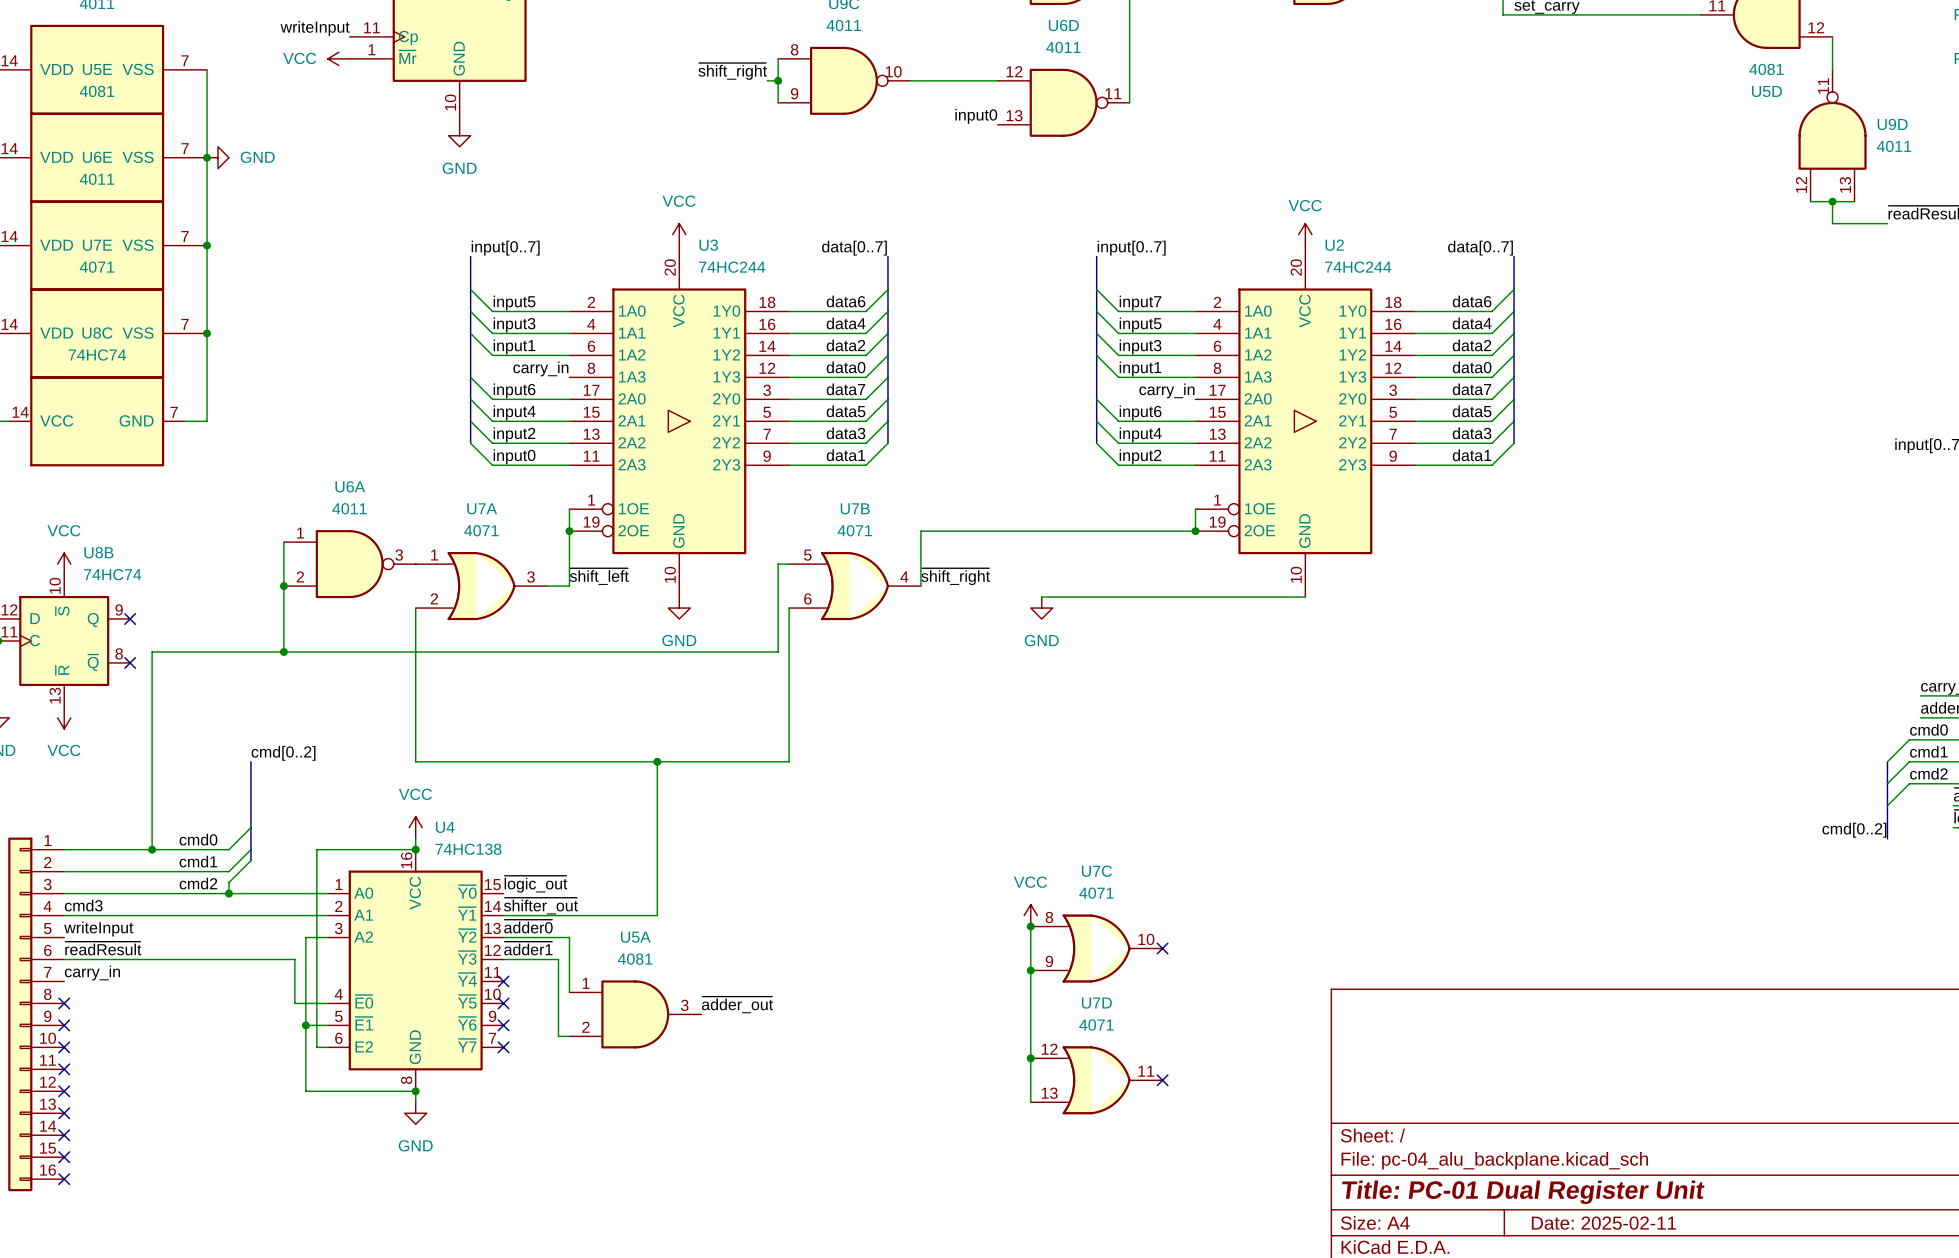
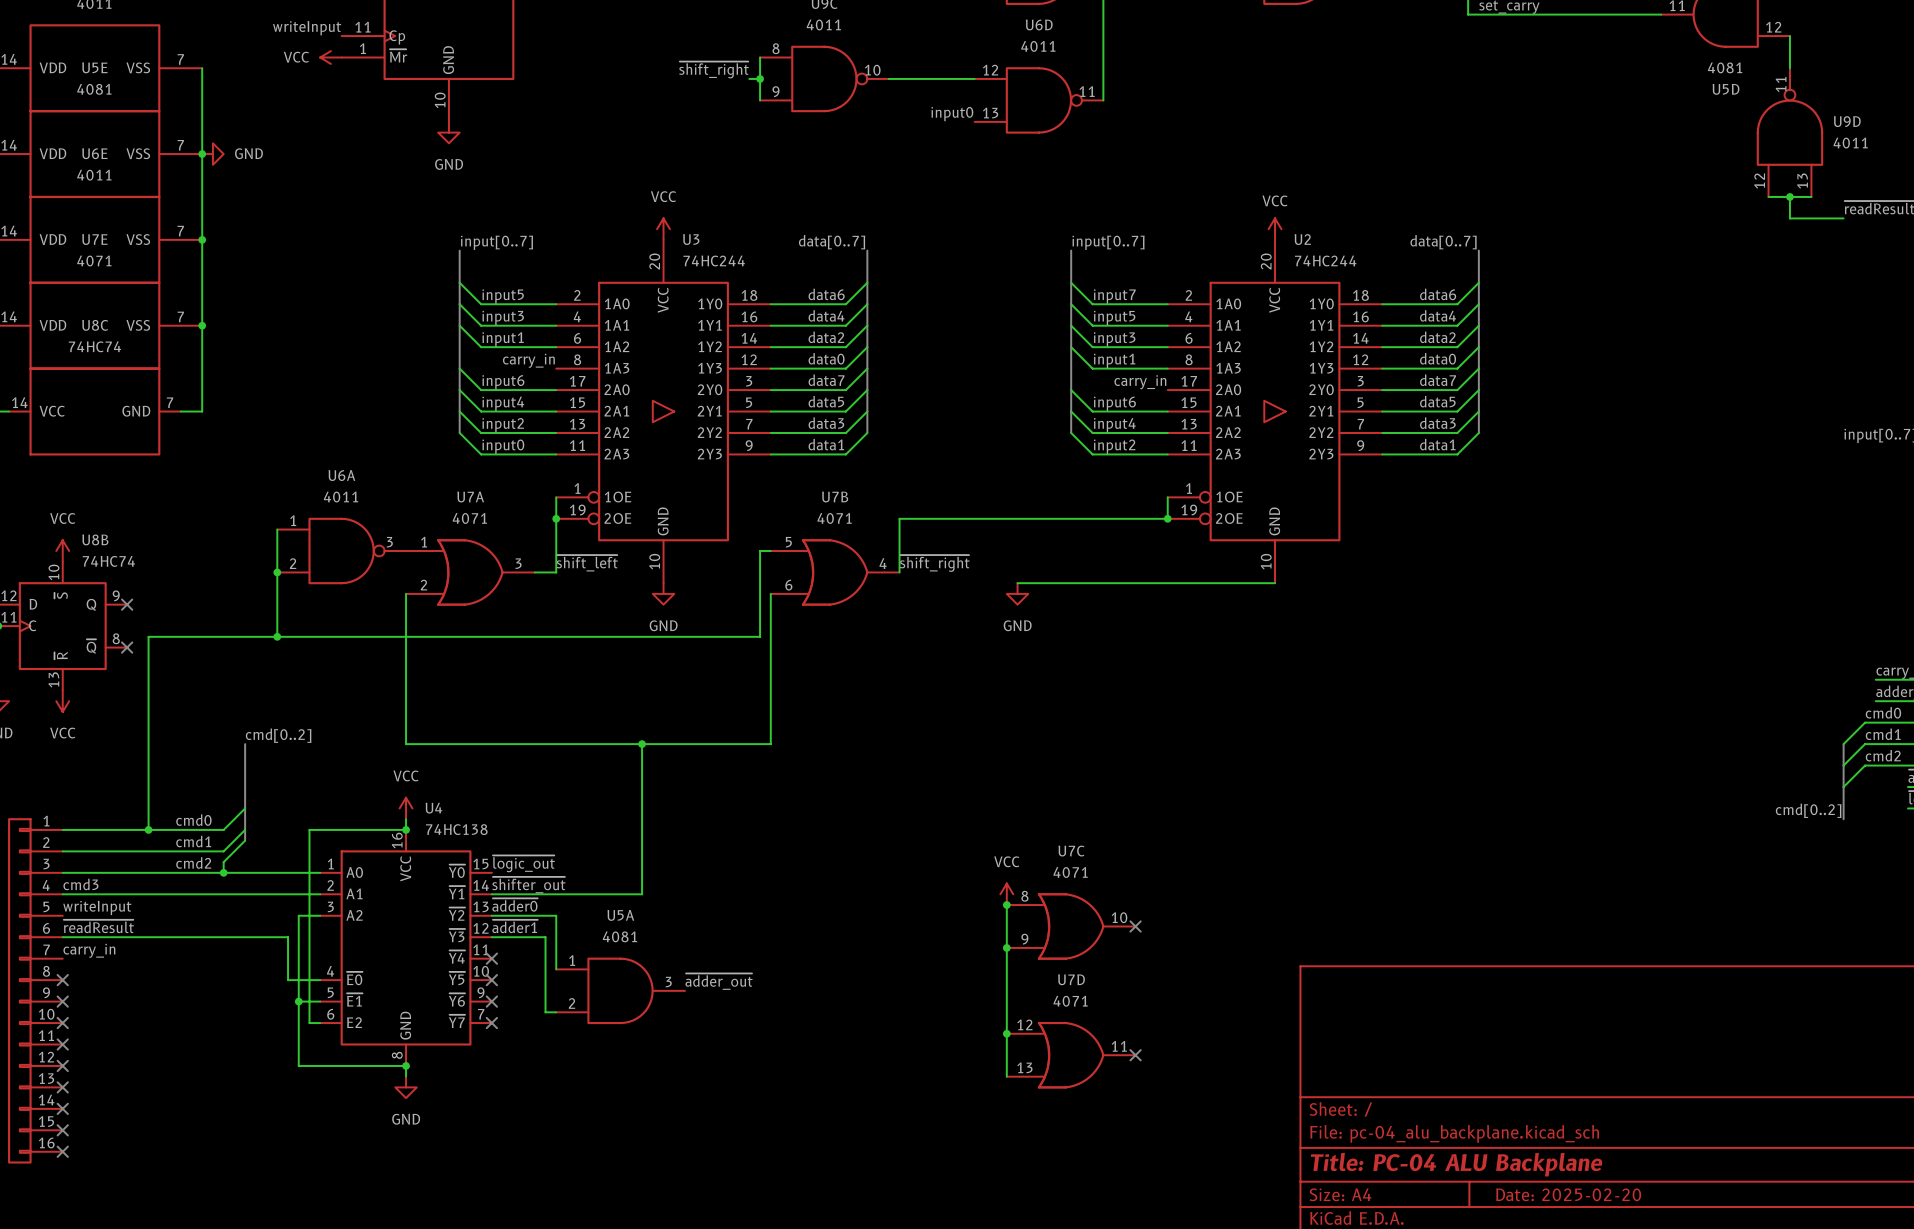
title block: Title: PC-01 Dual Register Unit (1523, 1192) -> Title: PC-04 ALU Backplane (1456, 1164)
title block: Date: 2025-02-11 (1603, 1223) -> Date: 2025-02-20 (1568, 1194)

